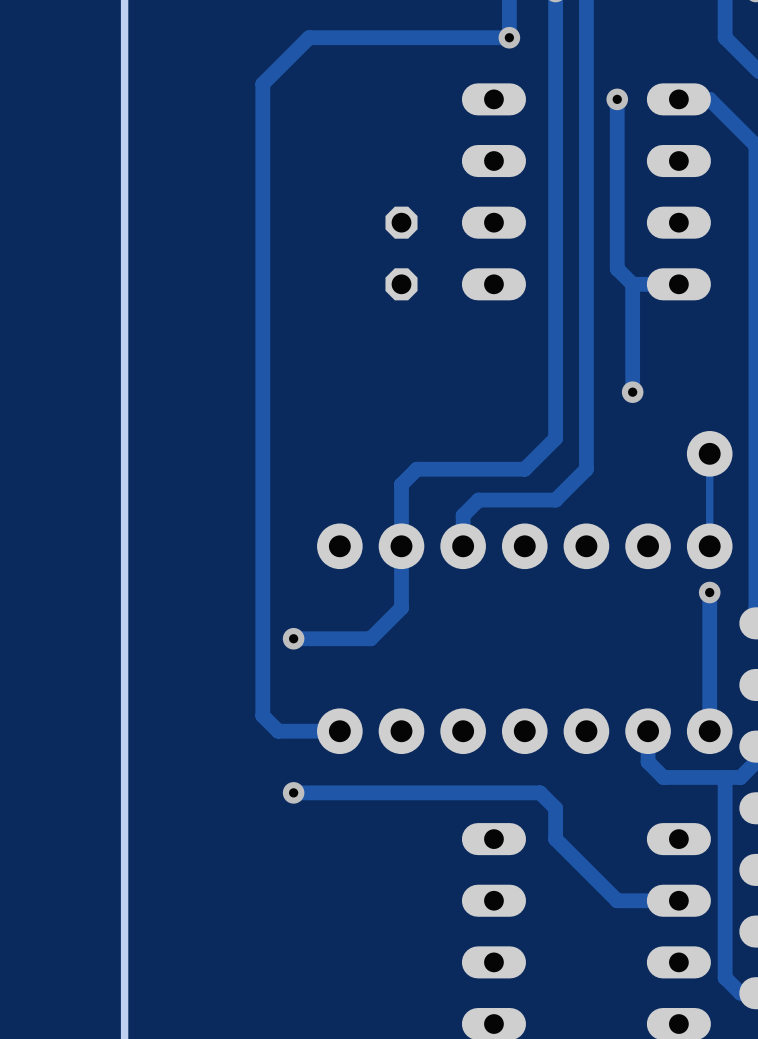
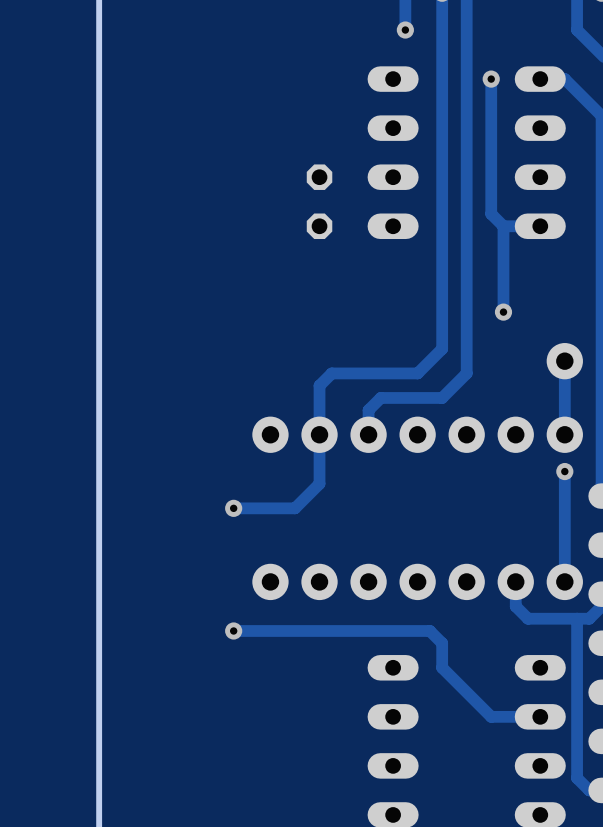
track: (509, 37) (309, 37) (262, 83) (262, 715) (278, 731) (339, 731) -> none
track width: thin (709, 453) (709, 546) -> thick (564, 361) (564, 434)

